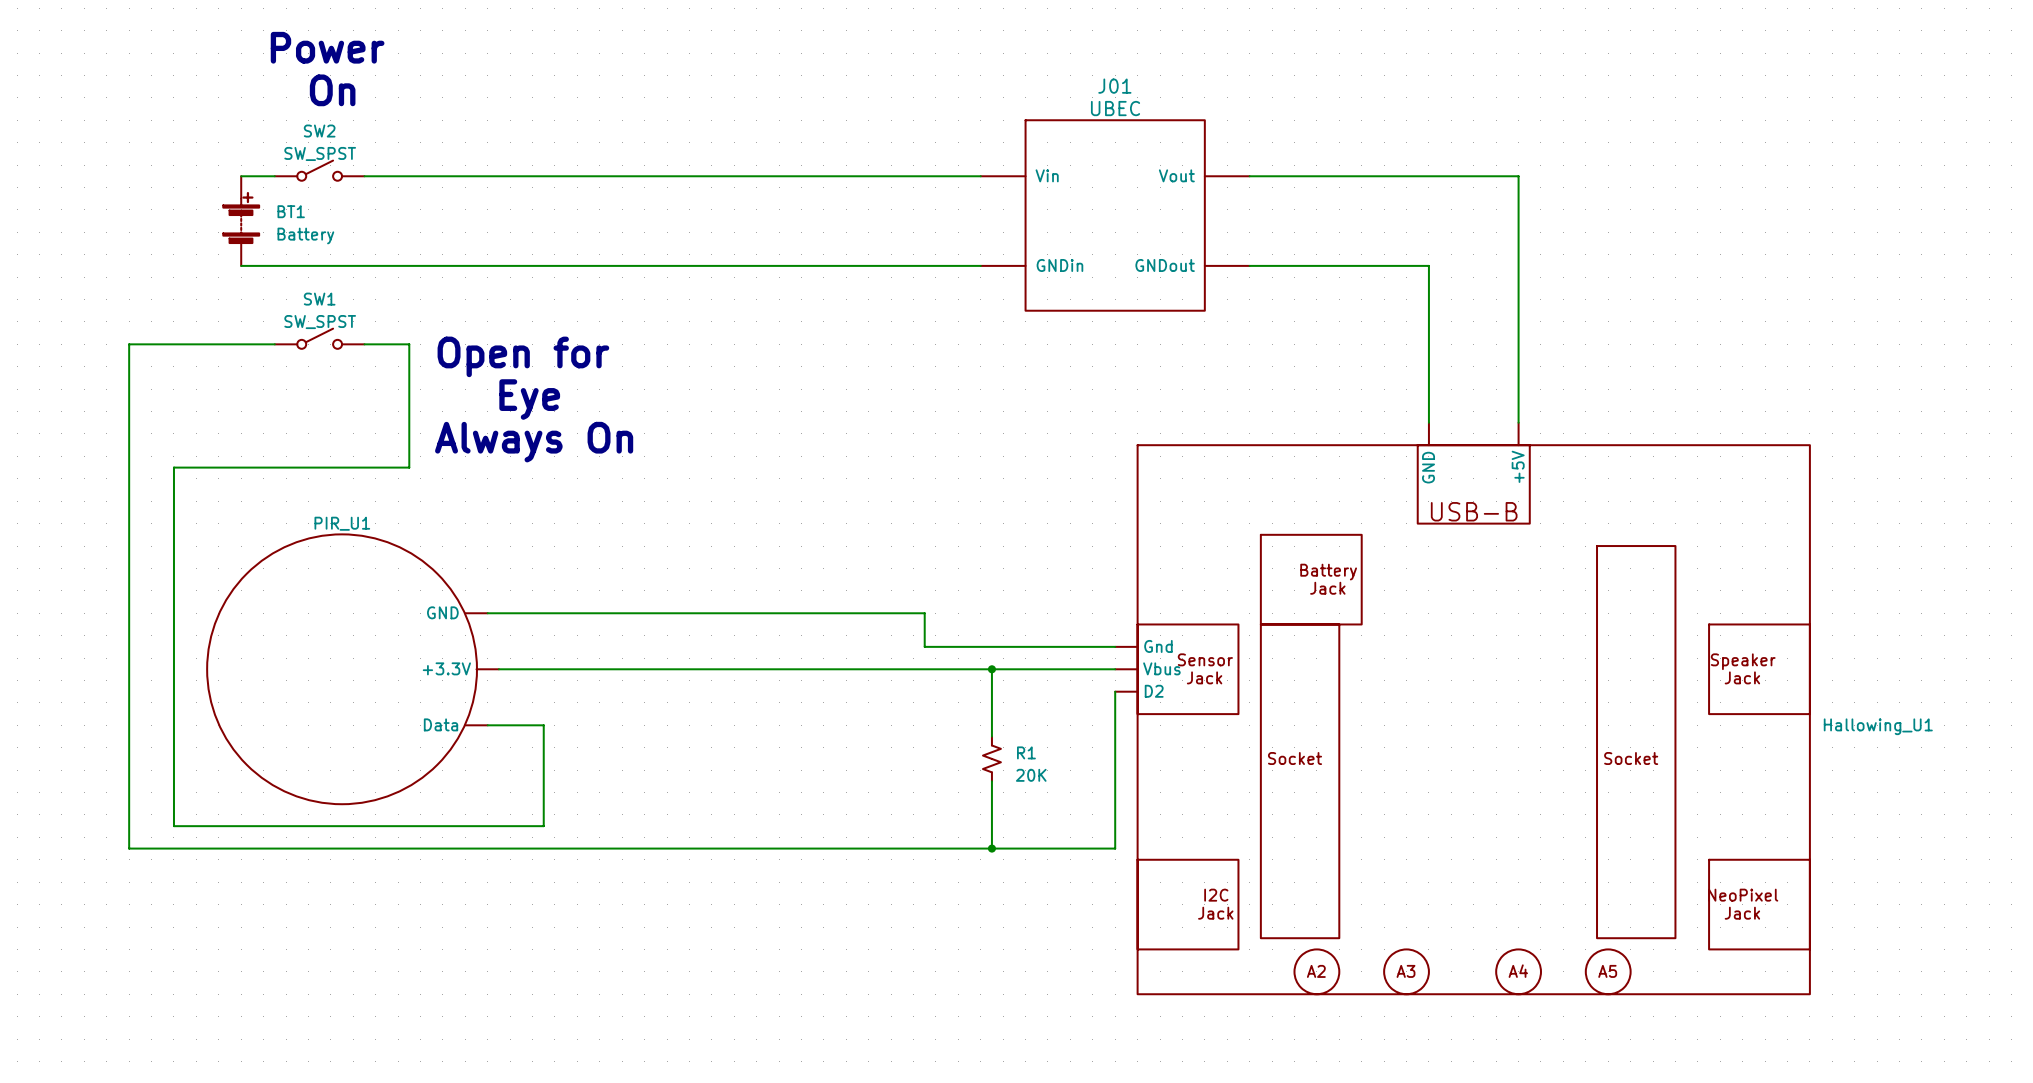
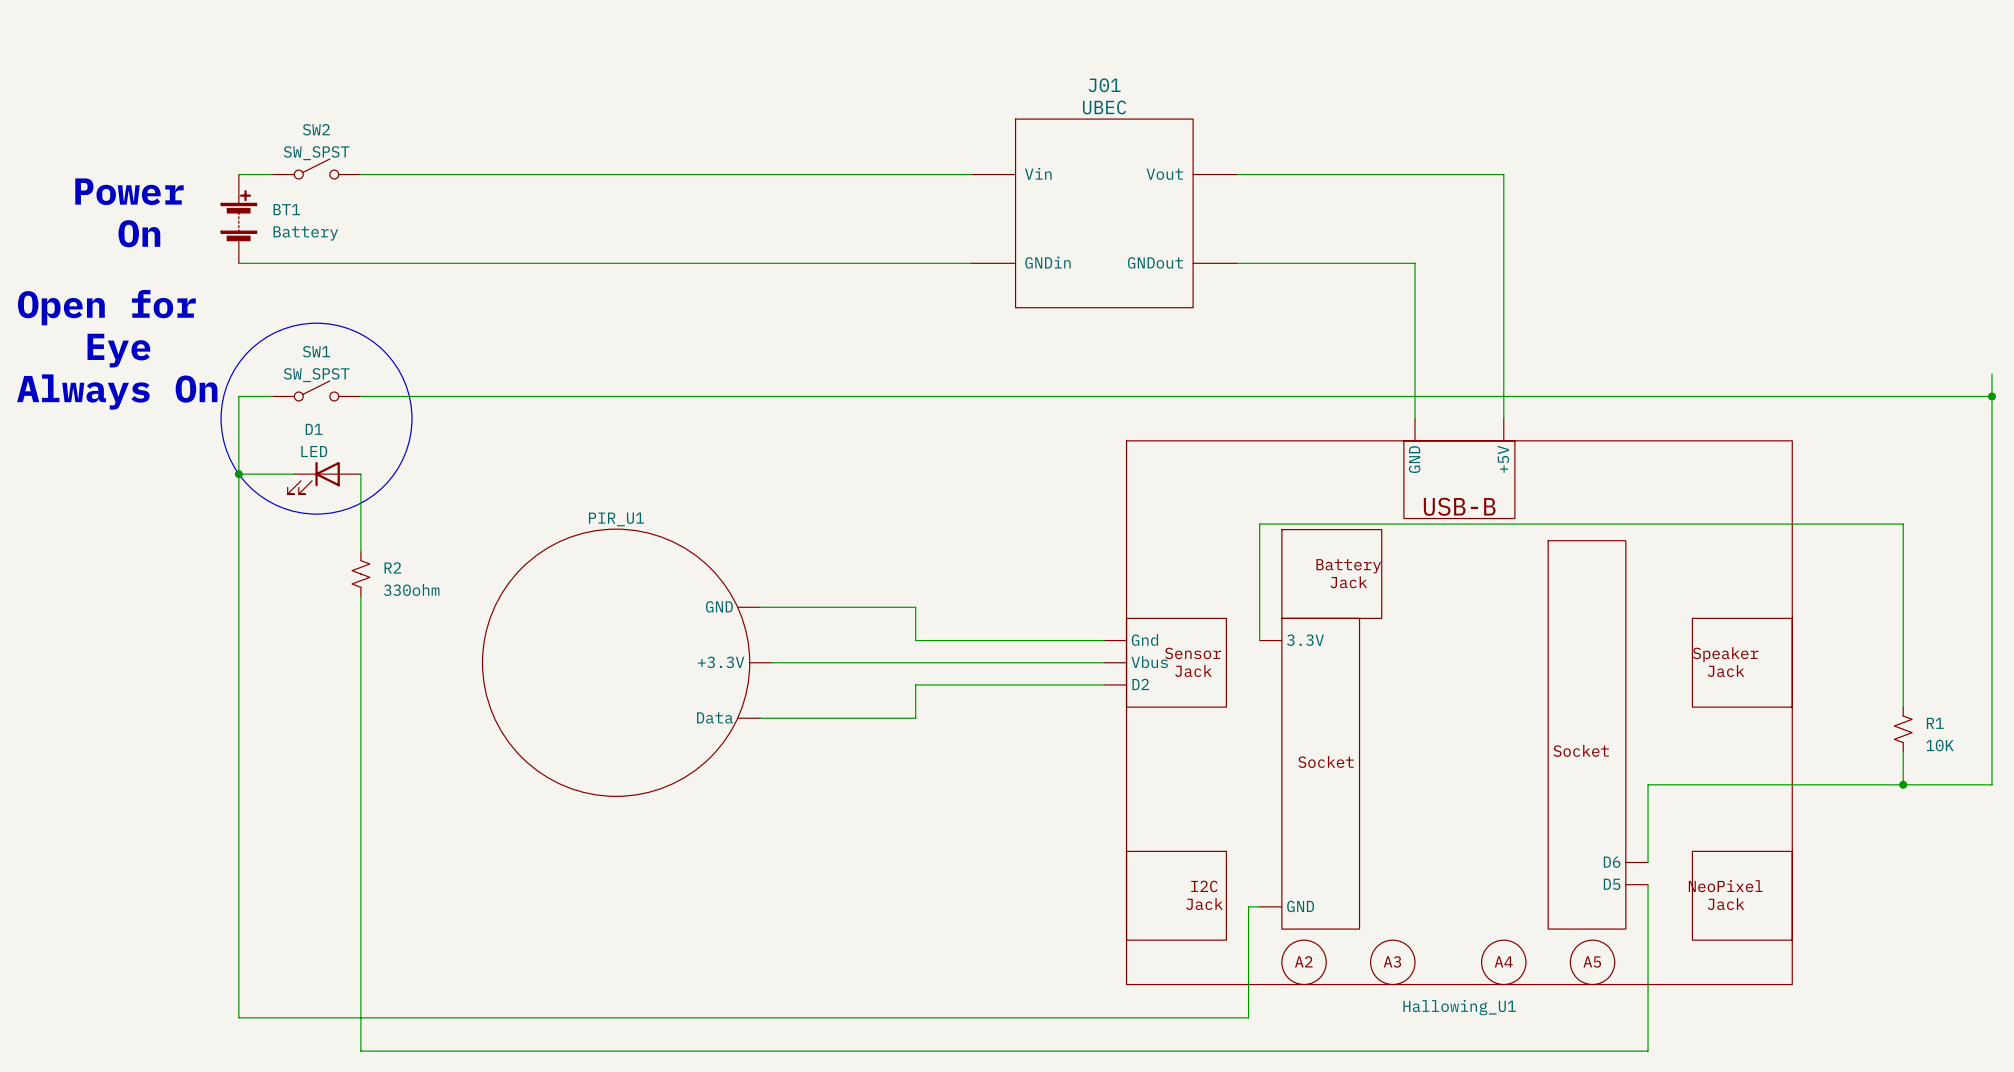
text: Power (327, 47) -> none
text: On (332, 90) -> none
text: none -> Power (129, 191)
text: none -> On (139, 233)
text: none -> Open for (106, 307)
drawing: none -> [221, 323, 412, 515]
SW1 position: (319, 338) -> (316, 390)
wire: (274, 344) (129, 344) (129, 848) (1115, 848) (1115, 691) -> (760, 718) (915, 718) (915, 684) (1104, 684)
wire: (364, 344) (409, 344) (409, 467) (173, 467) (173, 826) (543, 826) (543, 725) (487, 725) -> none
text: none -> Eye (118, 350)
text: Open for (523, 356) -> none
wire: none -> (1991, 374) (1991, 784) (1648, 784) (1648, 862)
text: none -> Always On (117, 392)
text: Eye (529, 399) -> none
wire: none -> (272, 396) (238, 396) (238, 1017) (1248, 1017) (1248, 906) (1259, 906)
wire: none -> (360, 396) (1991, 396)
junction: none -> (1991, 396)
Hallowing_U1 symbol: [1115, 422, 1810, 995] -> [1104, 418, 1793, 985]
text: Always On (534, 442) -> none
wire: none -> (238, 474) (294, 474)
junction: none -> (238, 474)
wire: none -> (360, 474) (360, 551)
D1: none -> LED (324, 478)
R2: none -> 330ohm (360, 573)
wire: none -> (360, 596) (360, 1051) (1648, 1051) (1648, 884)
wire: (487, 613) (767, 613) -> none
wire: none -> (1259, 640) (1259, 524) (1903, 524) (1903, 707)
PIR_U1 position: (353, 669) -> (626, 662)
wire: (498, 669) (779, 669) -> none
wire: (991, 669) (991, 736) -> none
junction: (991, 669) -> none
Hallowing_U1 name position: Hallowing_U1 (1878, 726) -> Hallowing_U1 (1459, 1007)
R1 position: (991, 758) -> (1903, 729)
wire: none -> (1903, 751) (1903, 784)
R1 value: 20K (1031, 775) -> 10K (1939, 745)
wire: (991, 781) (991, 848) -> none
junction: none -> (1903, 784)
junction: (991, 848) -> none

